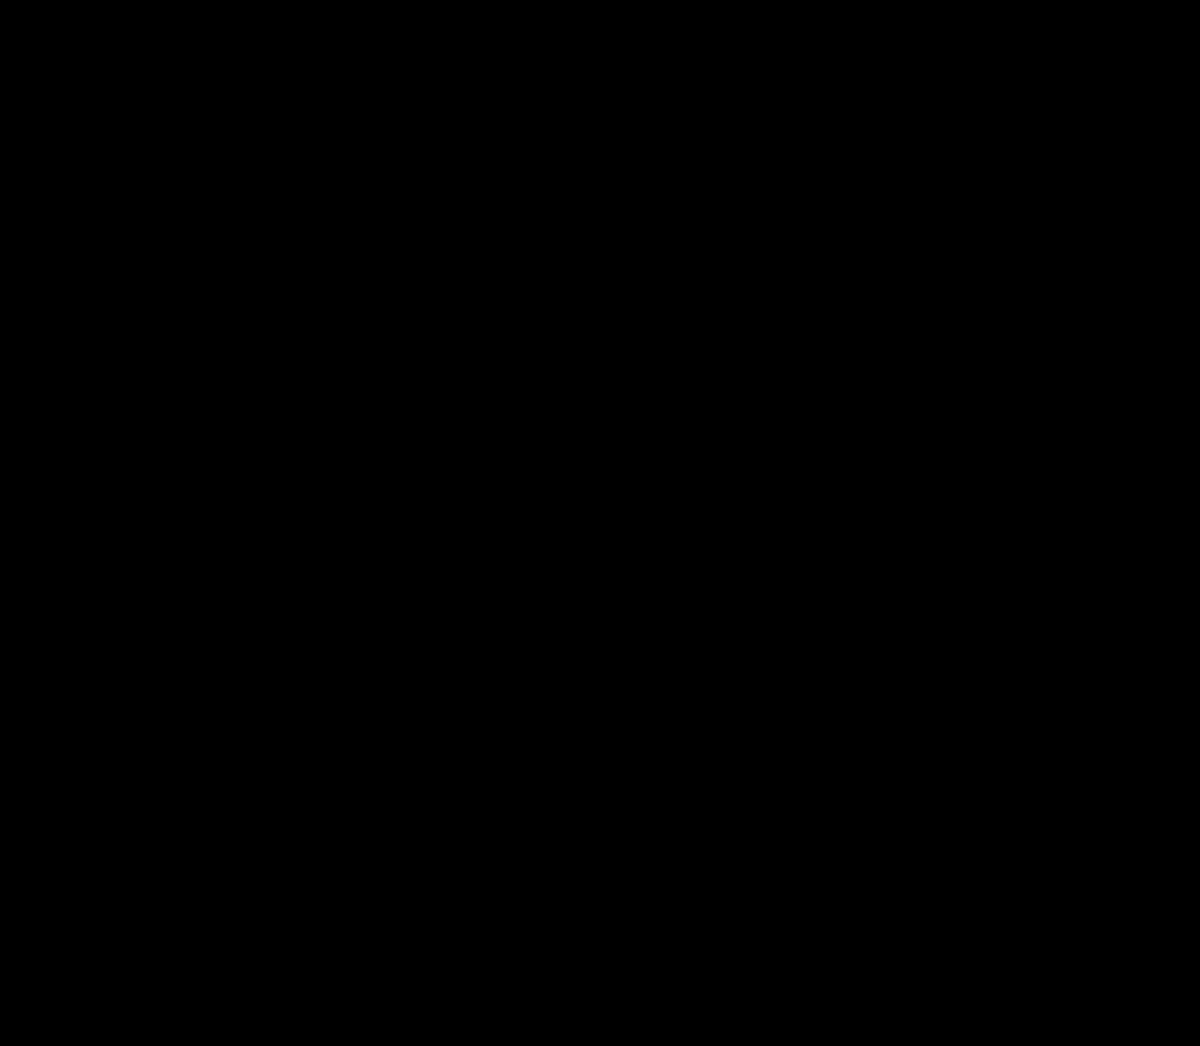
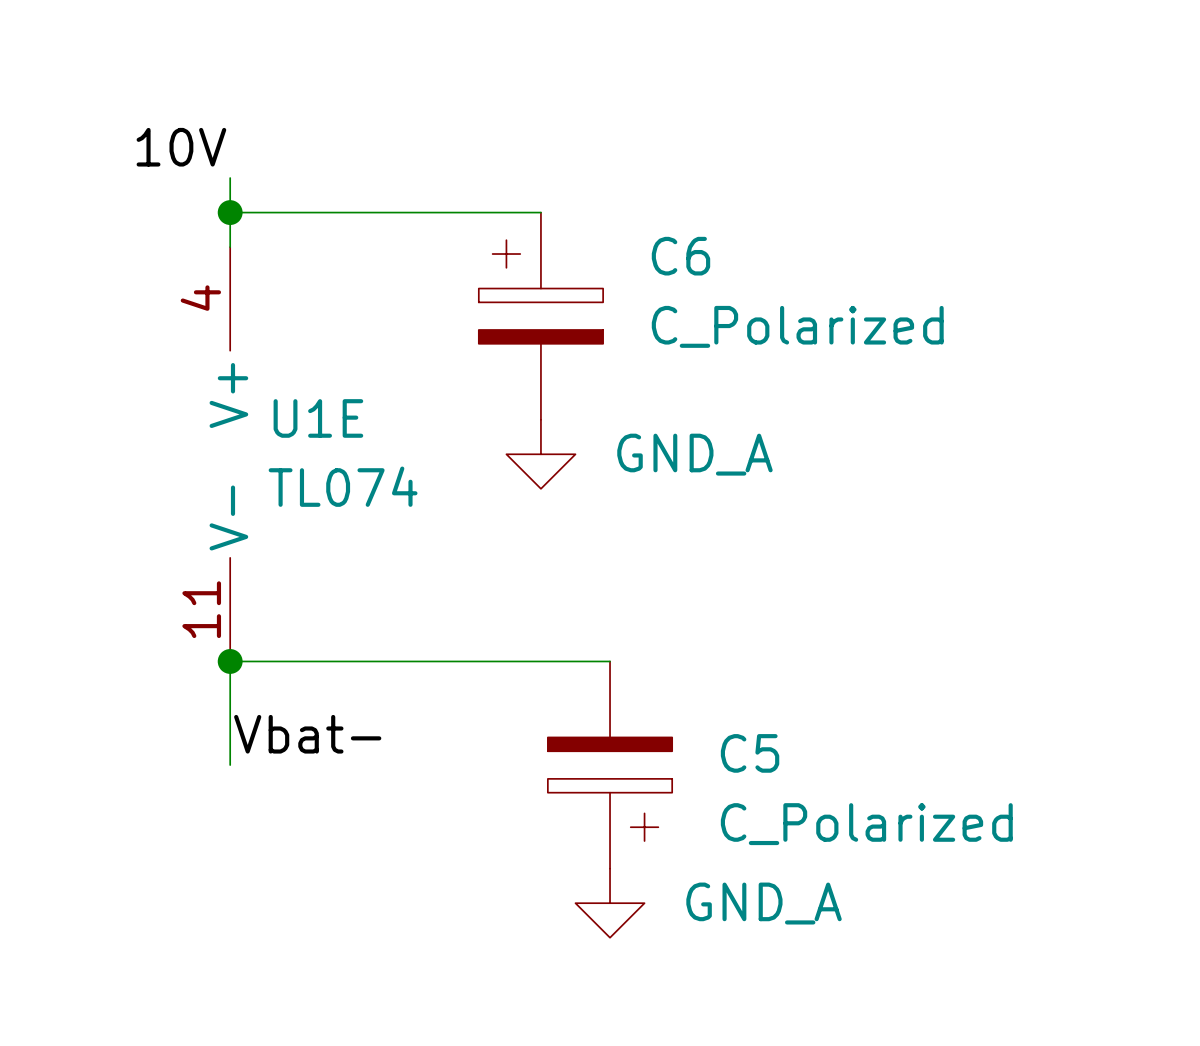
label: none -> 10V (181, 147)
wire: none -> (230, 178) (230, 247)
wire: none -> (230, 212) (540, 212)
junction: none -> (230, 212)
C6: none -> C_Polarized (540, 316)
U1E: none -> TL074 (230, 454)
power symbol: none -> GND_A (540, 454)
junction: none -> (230, 661)
wire: none -> (610, 661) (230, 661) (230, 765)
label: none -> Vbat- (307, 734)
C5: none -> C_Polarized (610, 765)
power symbol: none -> GND_A (610, 903)

